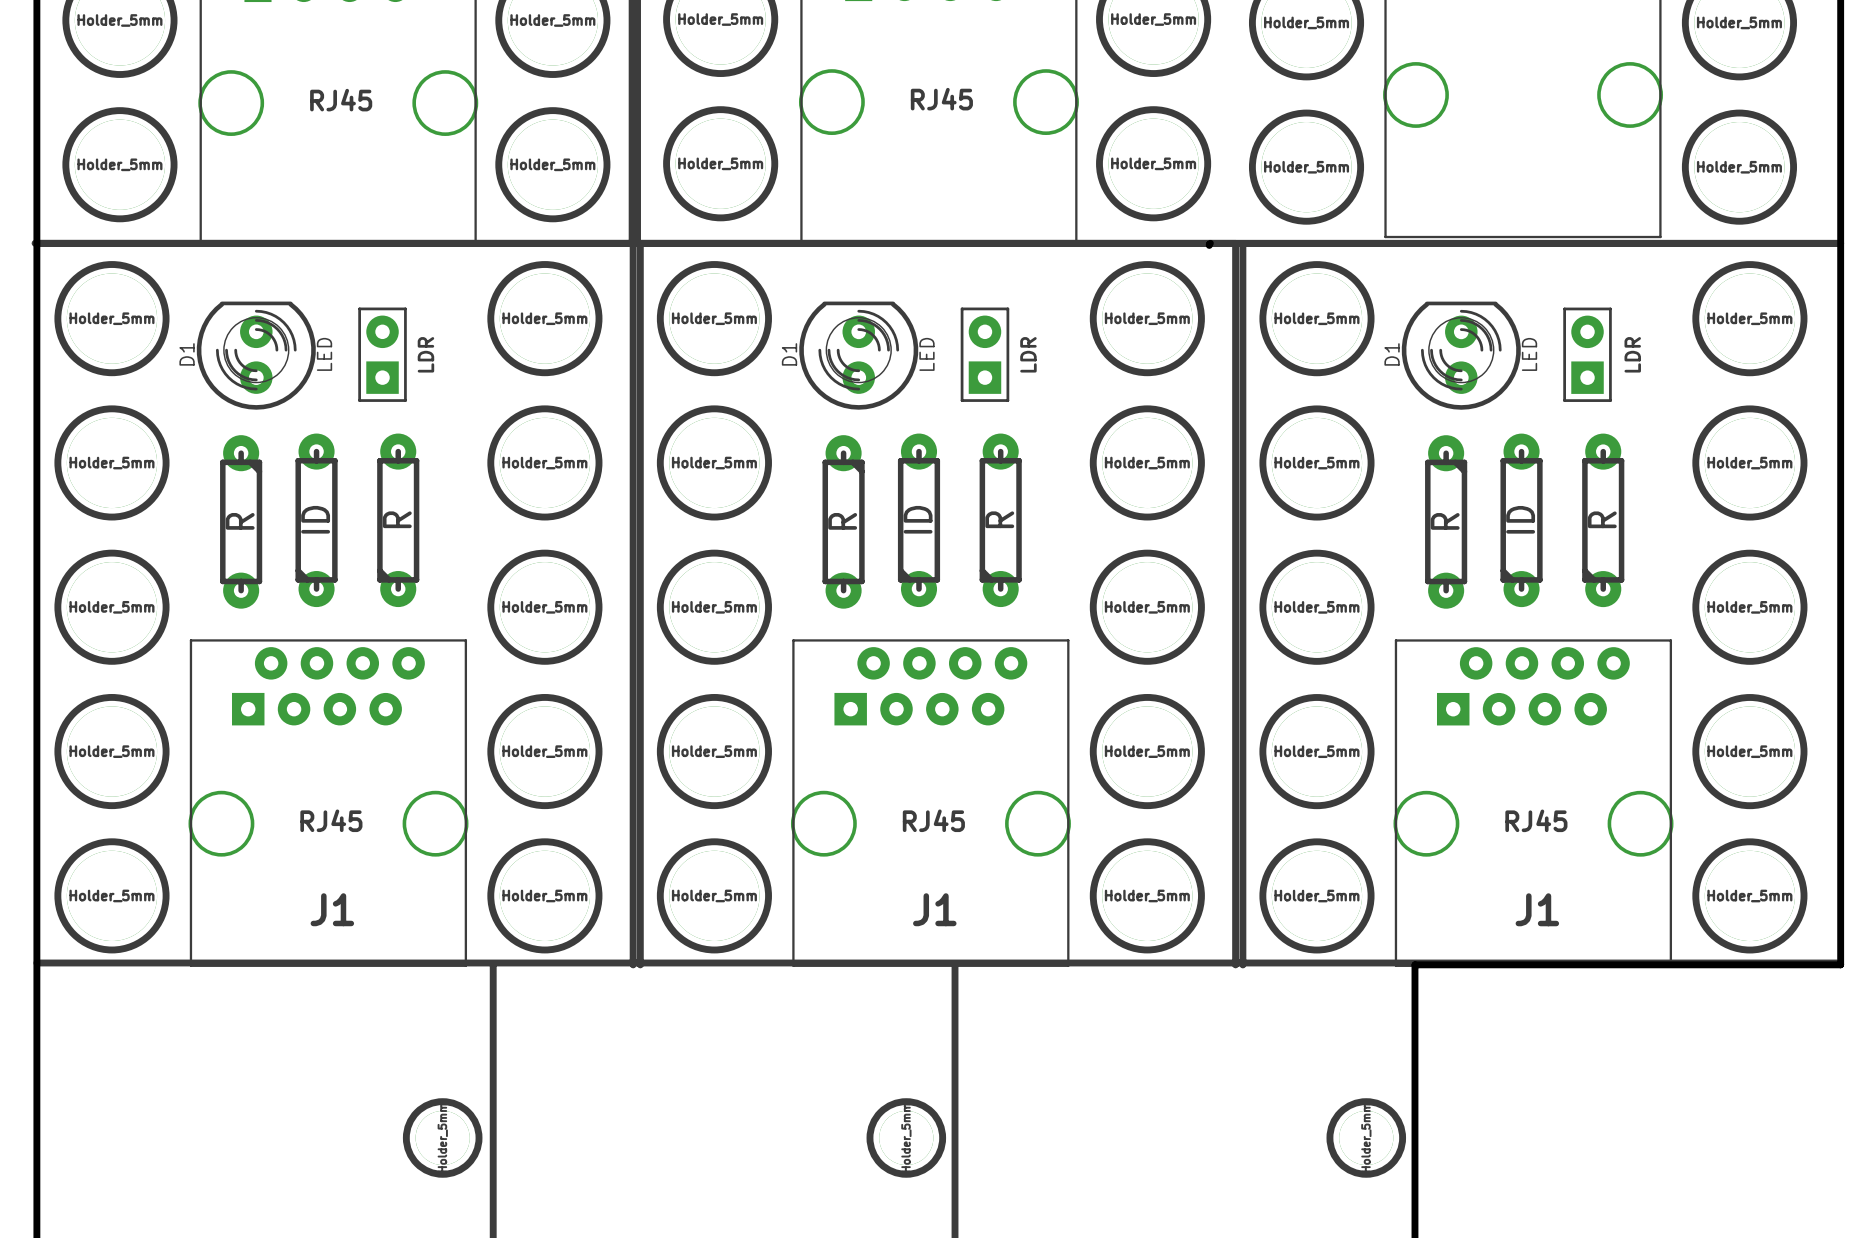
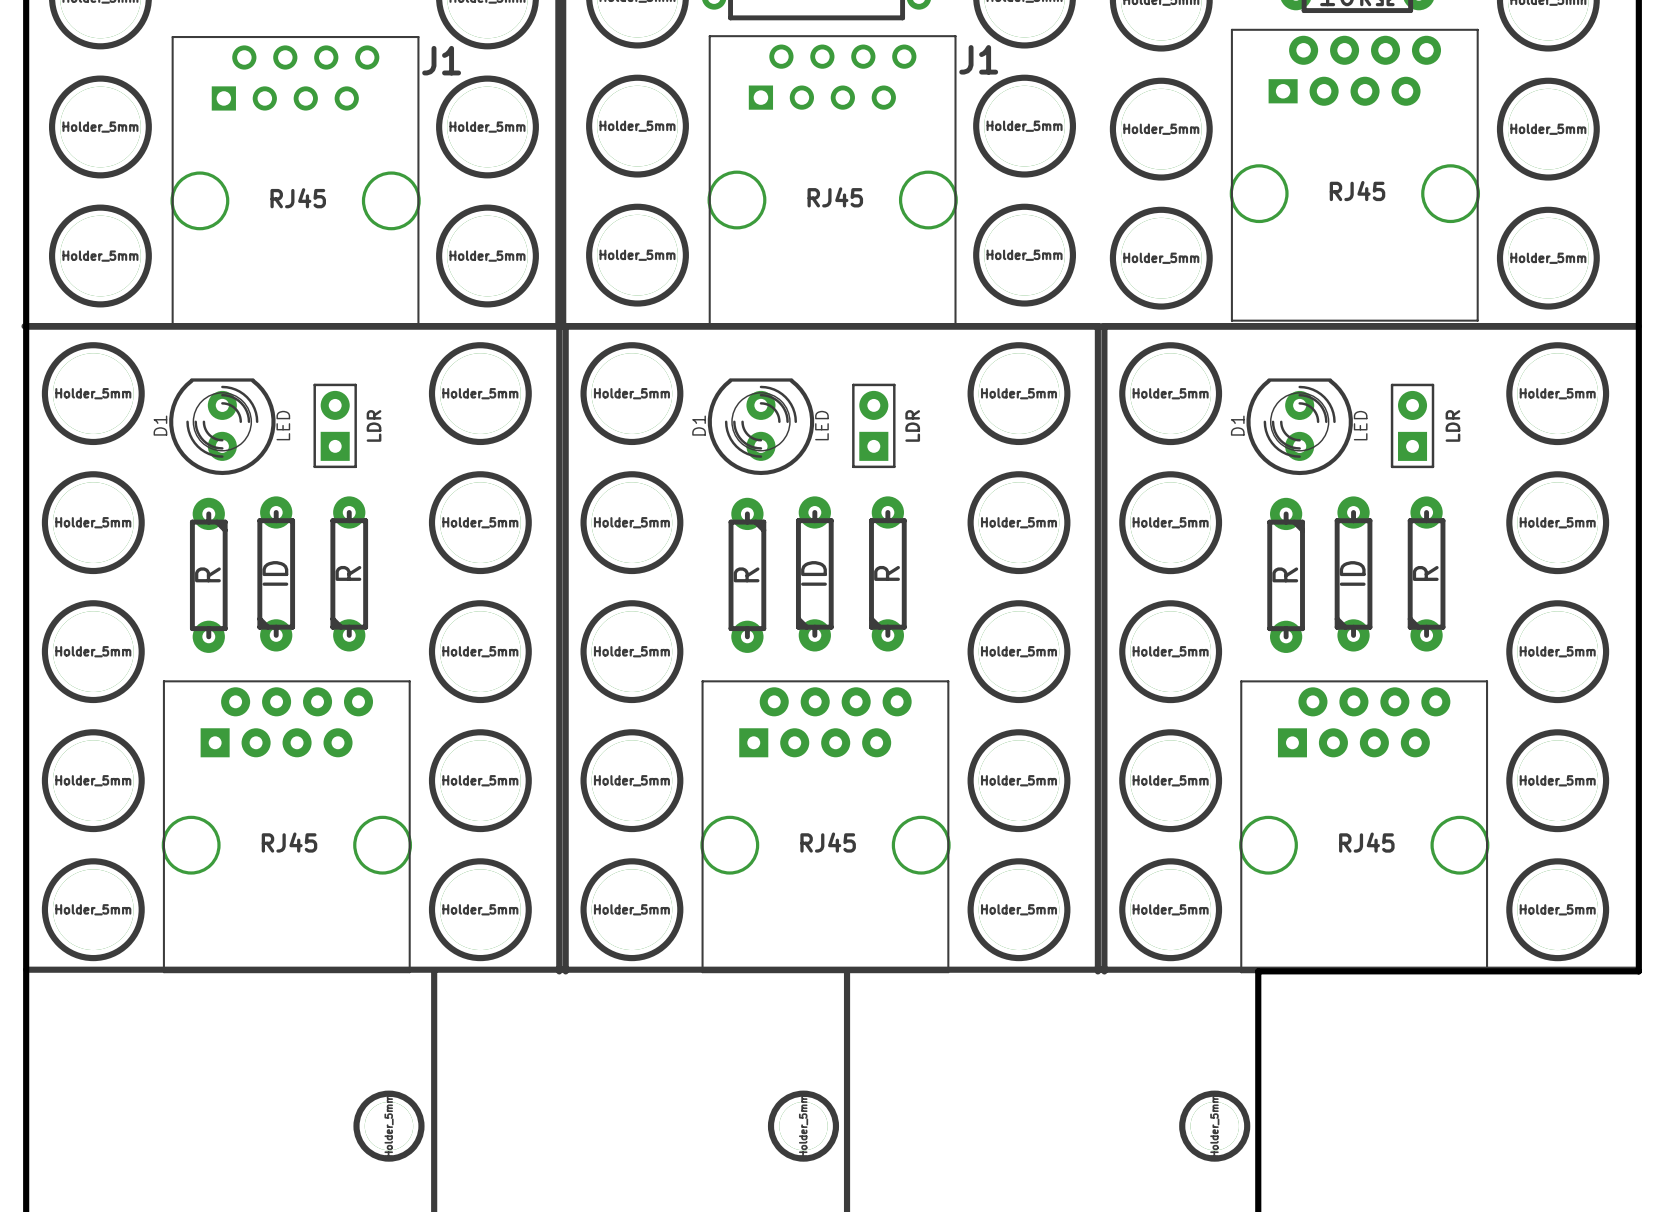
part value: none -> RJ45 (1357, 191)
board edge: (1210, 243) (1209, 245) -> none
J1 name: J1 (332, 909) -> none
J1 name: J1 (934, 909) -> none
J1 name: J1 (1537, 909) -> none

